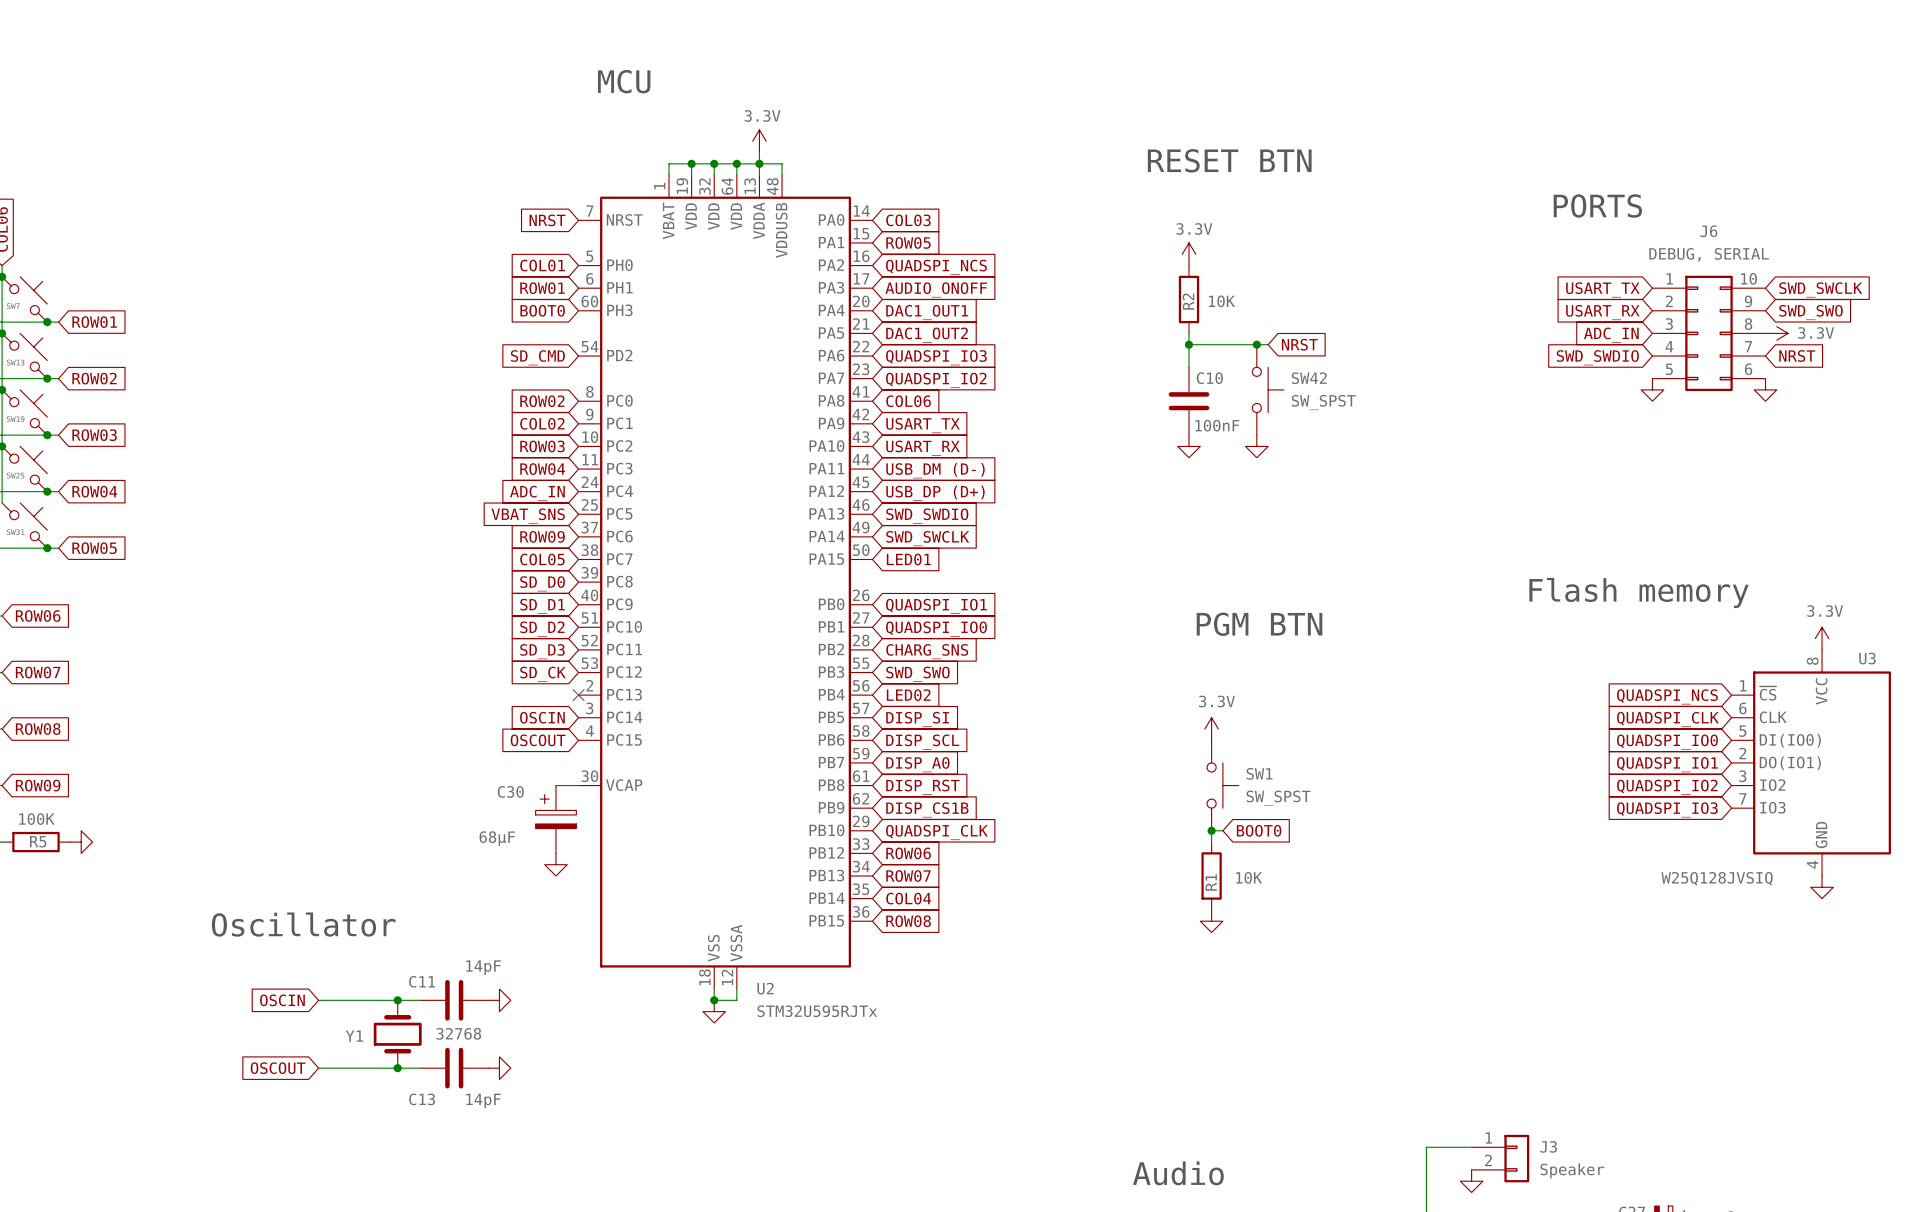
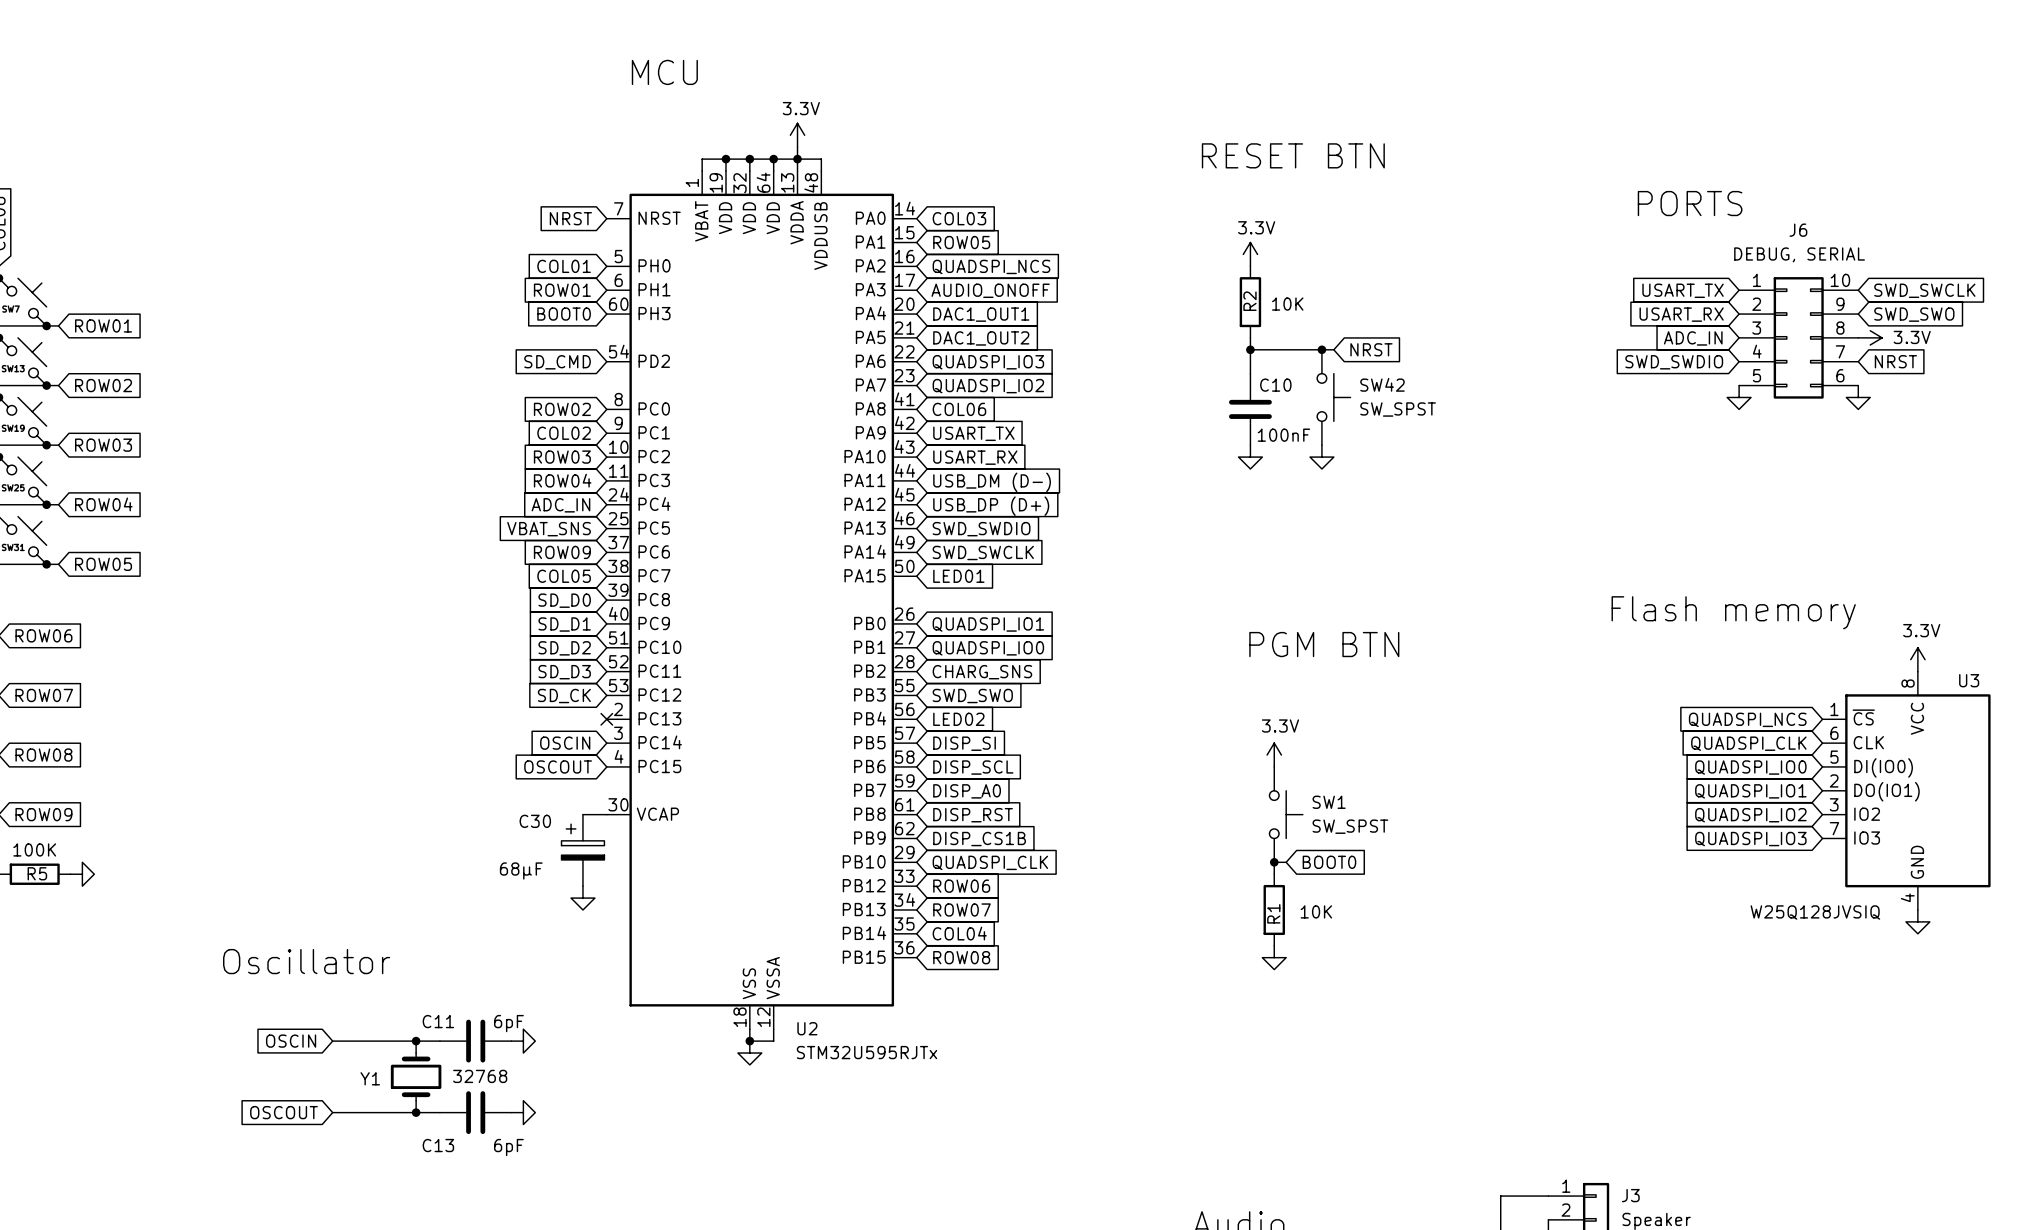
C11 value: 14pF (483, 967) -> 6pF (508, 1023)
C13 value: 14pF (483, 1101) -> 6pF (508, 1147)

